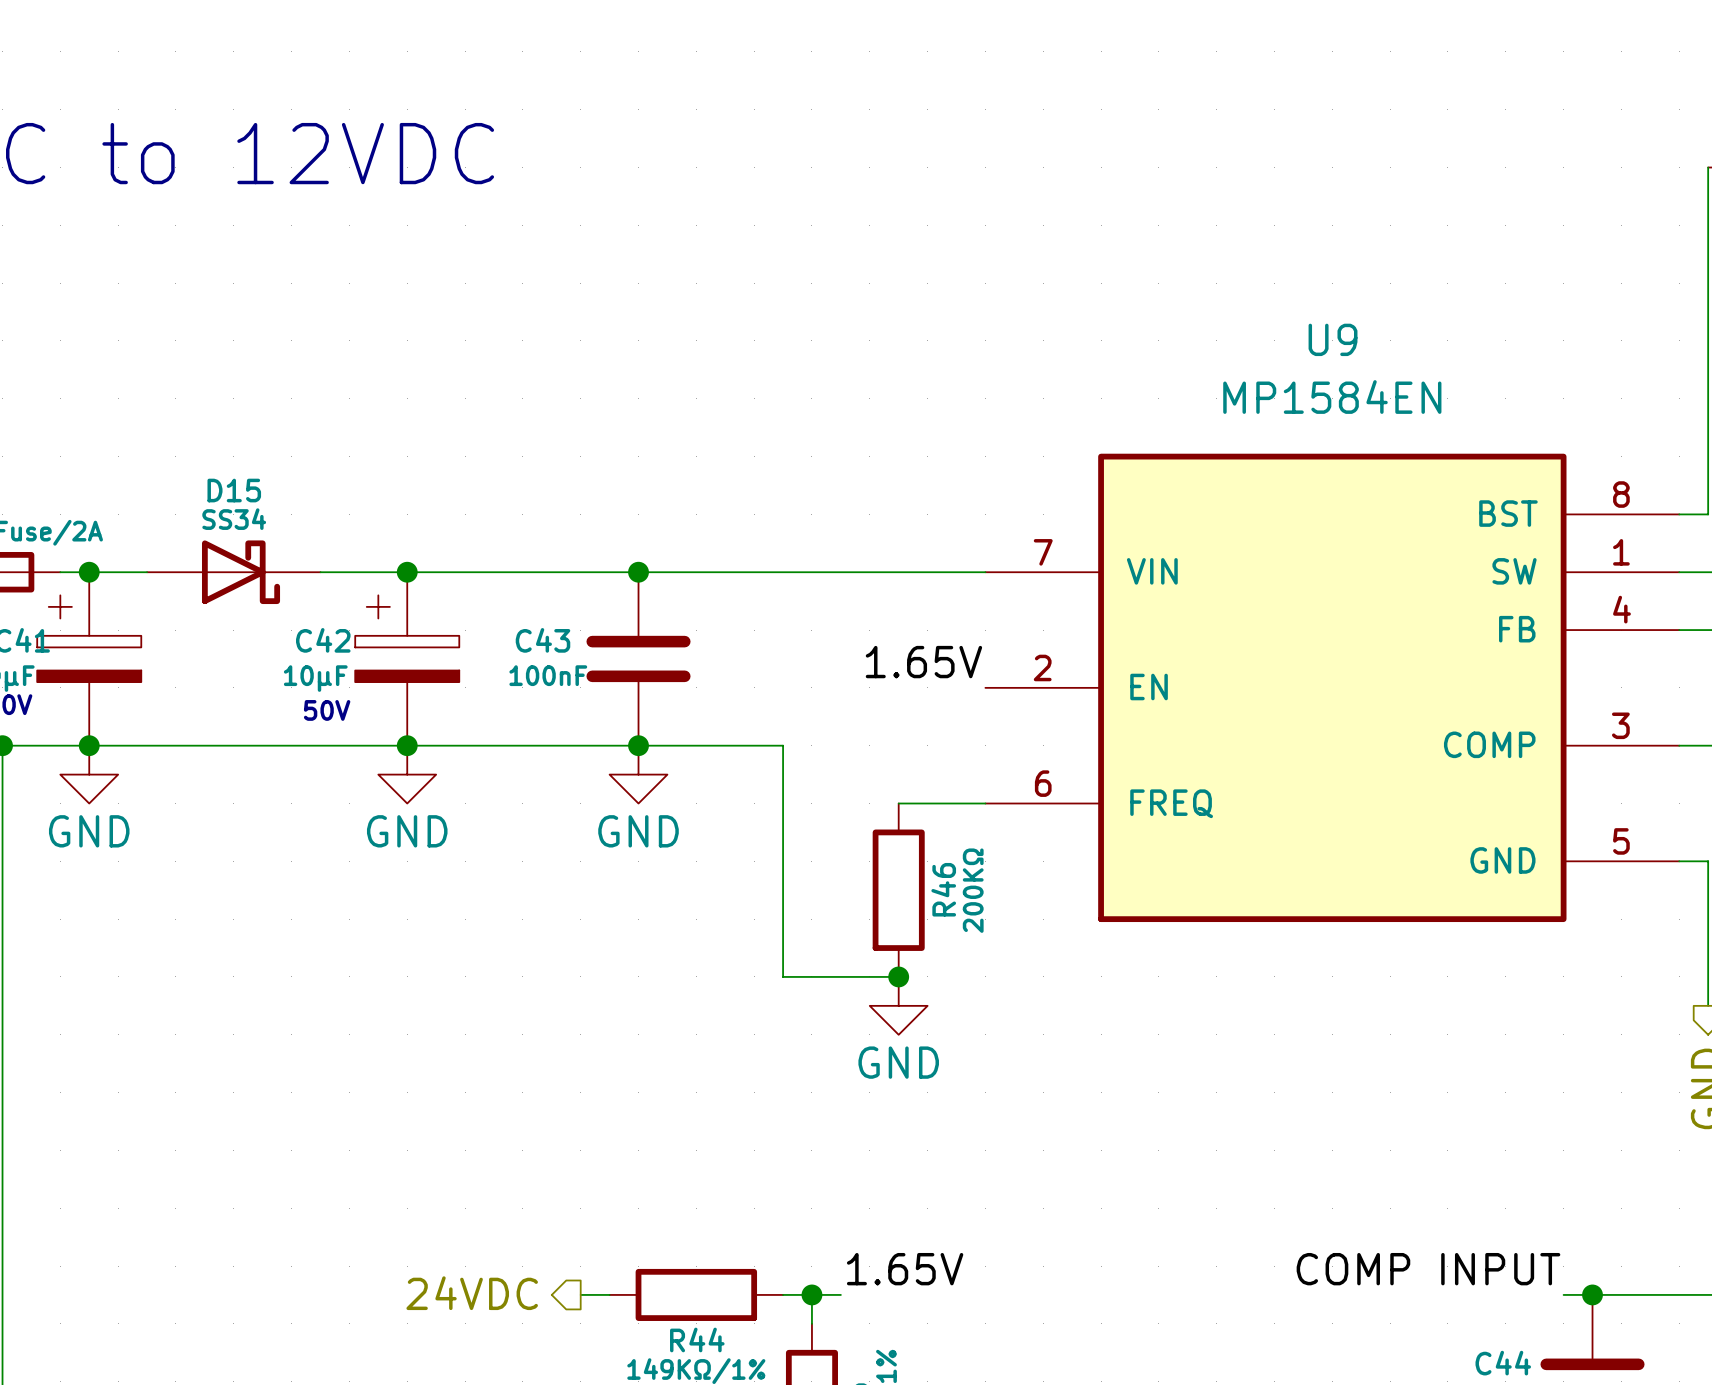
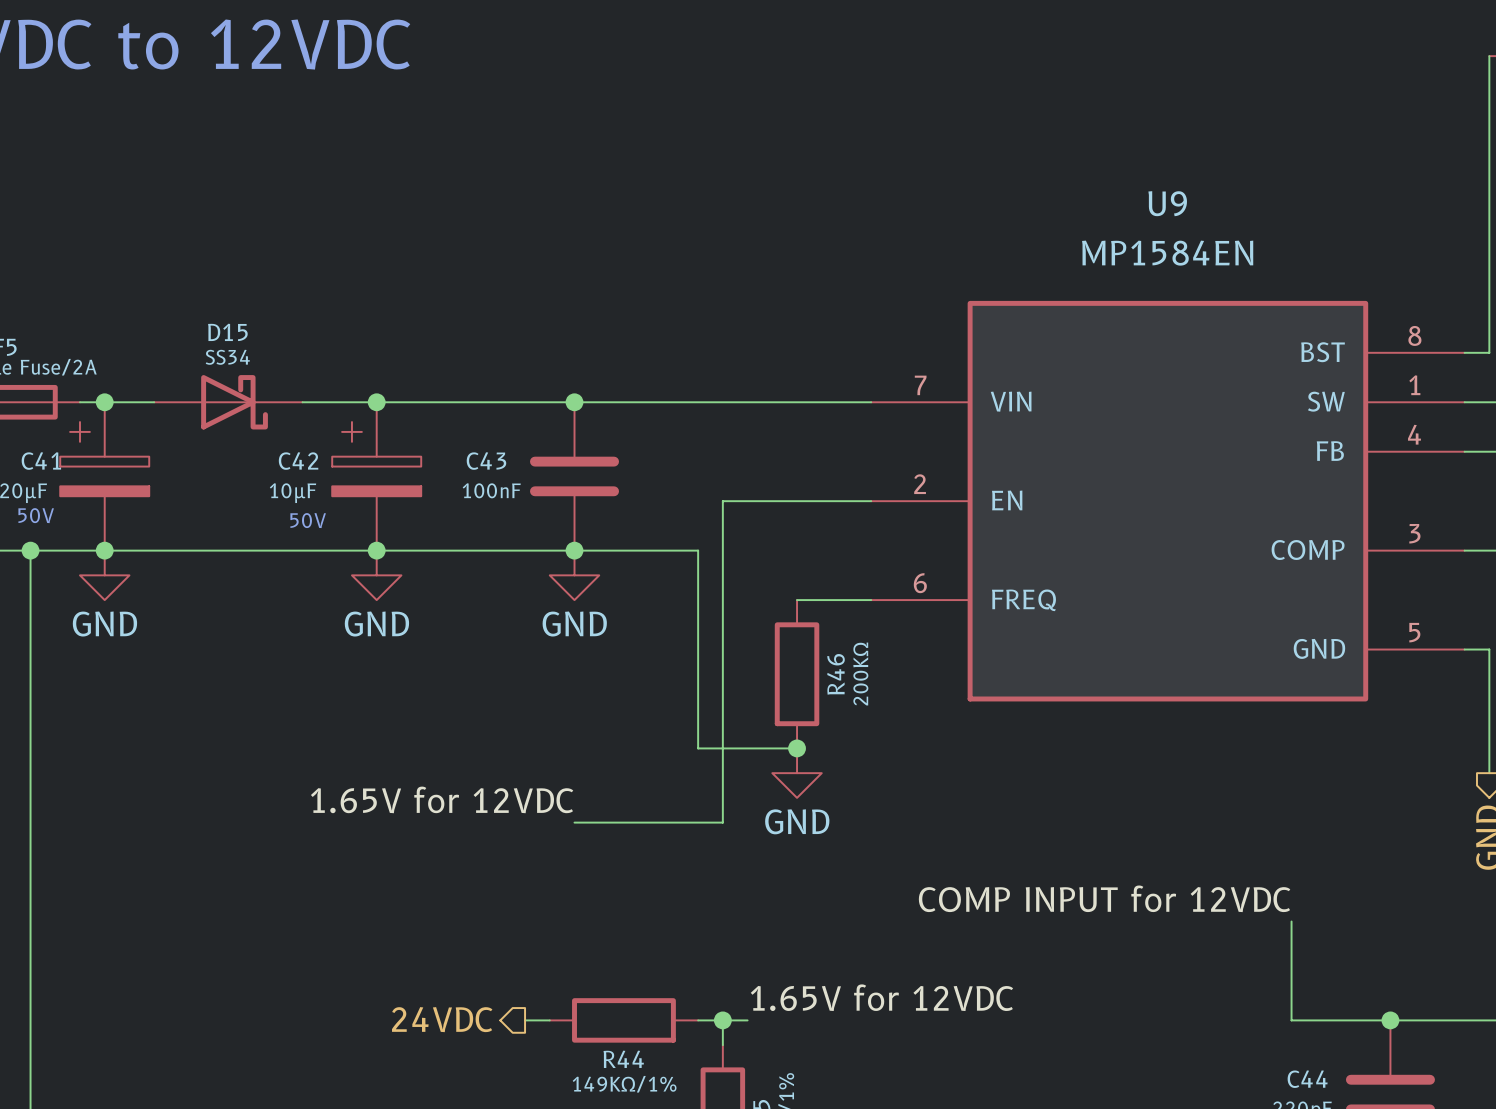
label: 1.65V (923, 662) -> none
wire: none -> (871, 501) (722, 501) (722, 822) (574, 822)
label: none -> 1.65V for 12VDC (442, 799)
label: none -> COMP INPUT for 12VDC (1104, 898)
wire: none -> (1291, 921) (1291, 1020) (1365, 1020)
label: 1.65V (905, 1269) -> 1.65V for 12VDC (881, 997)
label: COMP INPUT (1428, 1269) -> none

